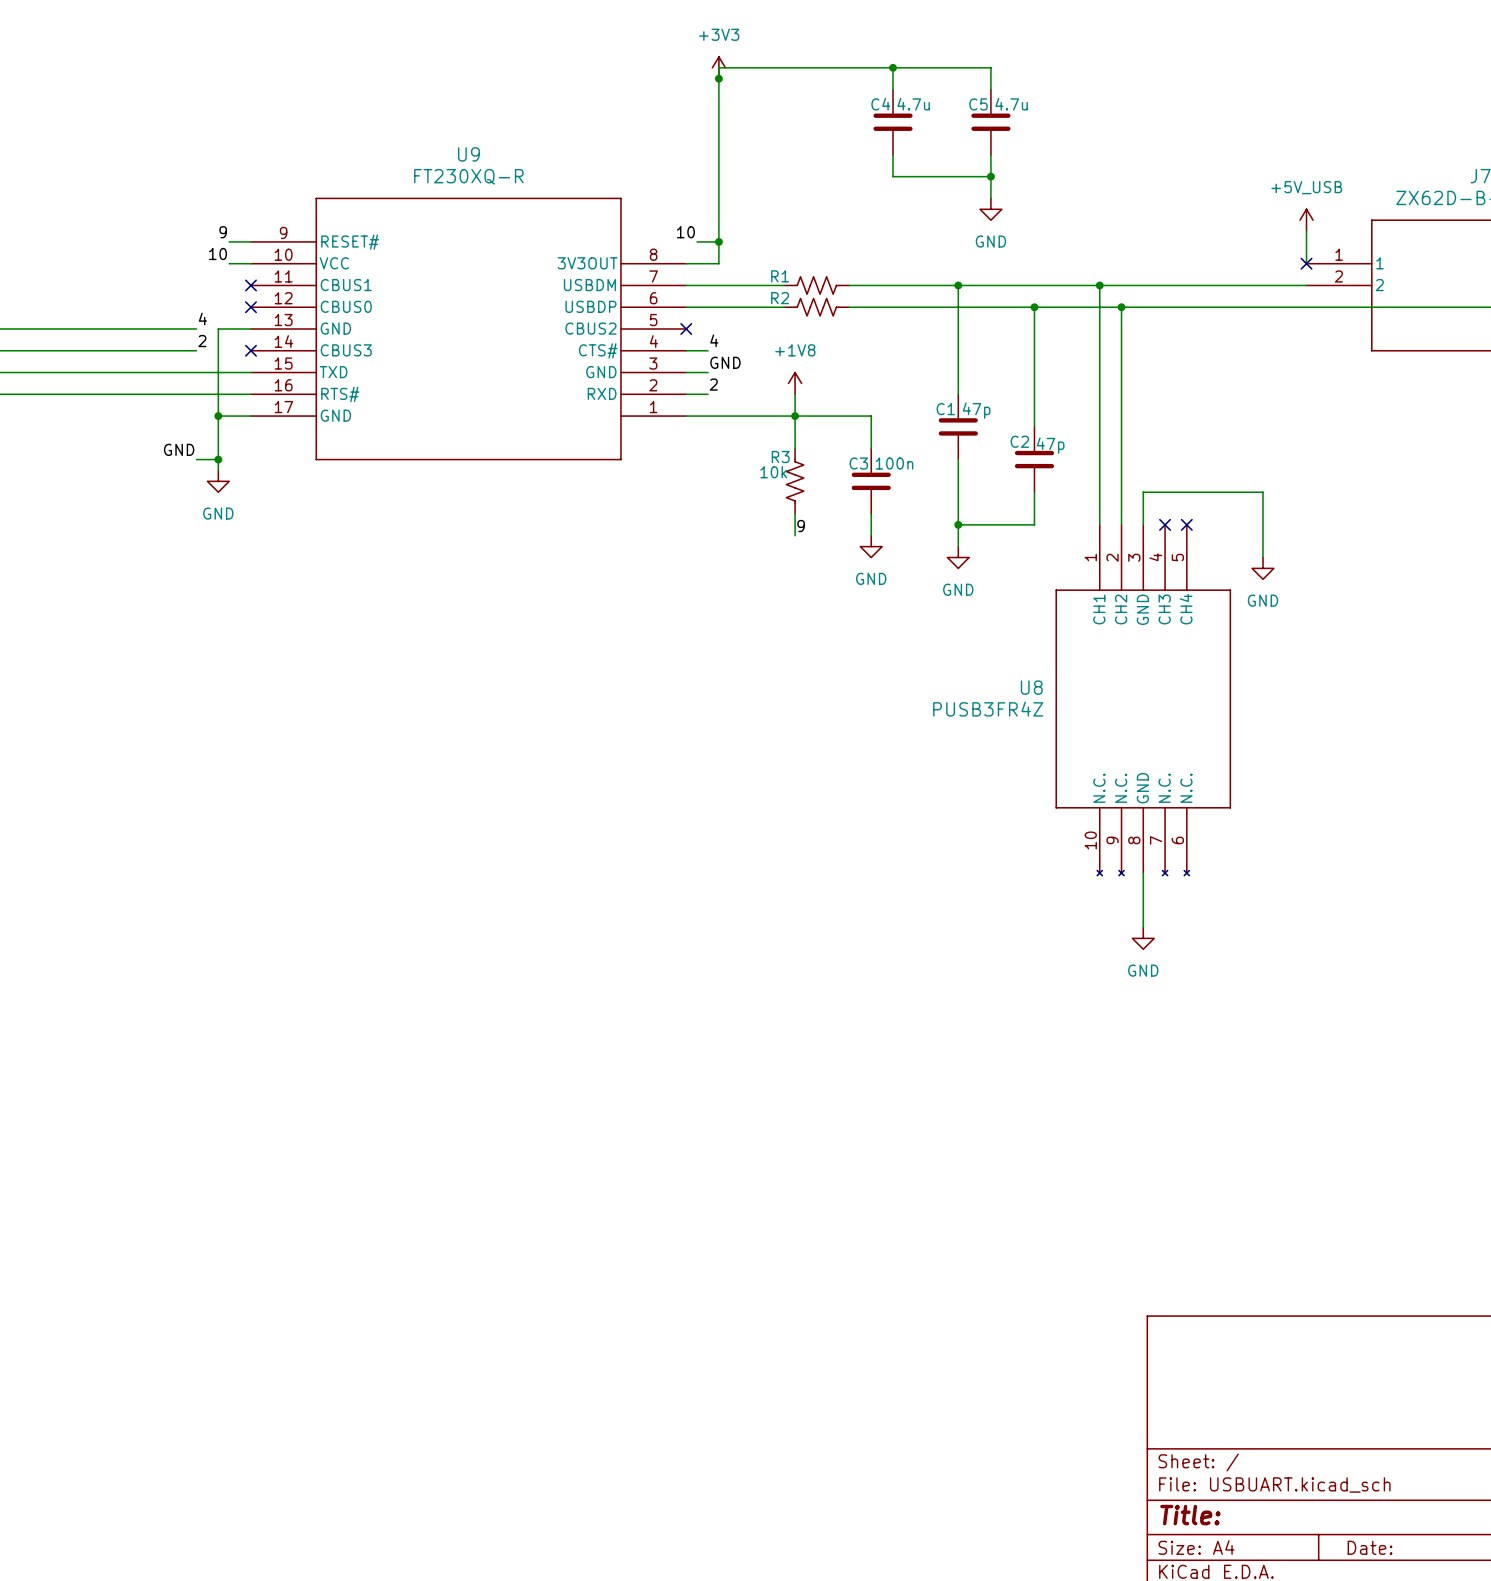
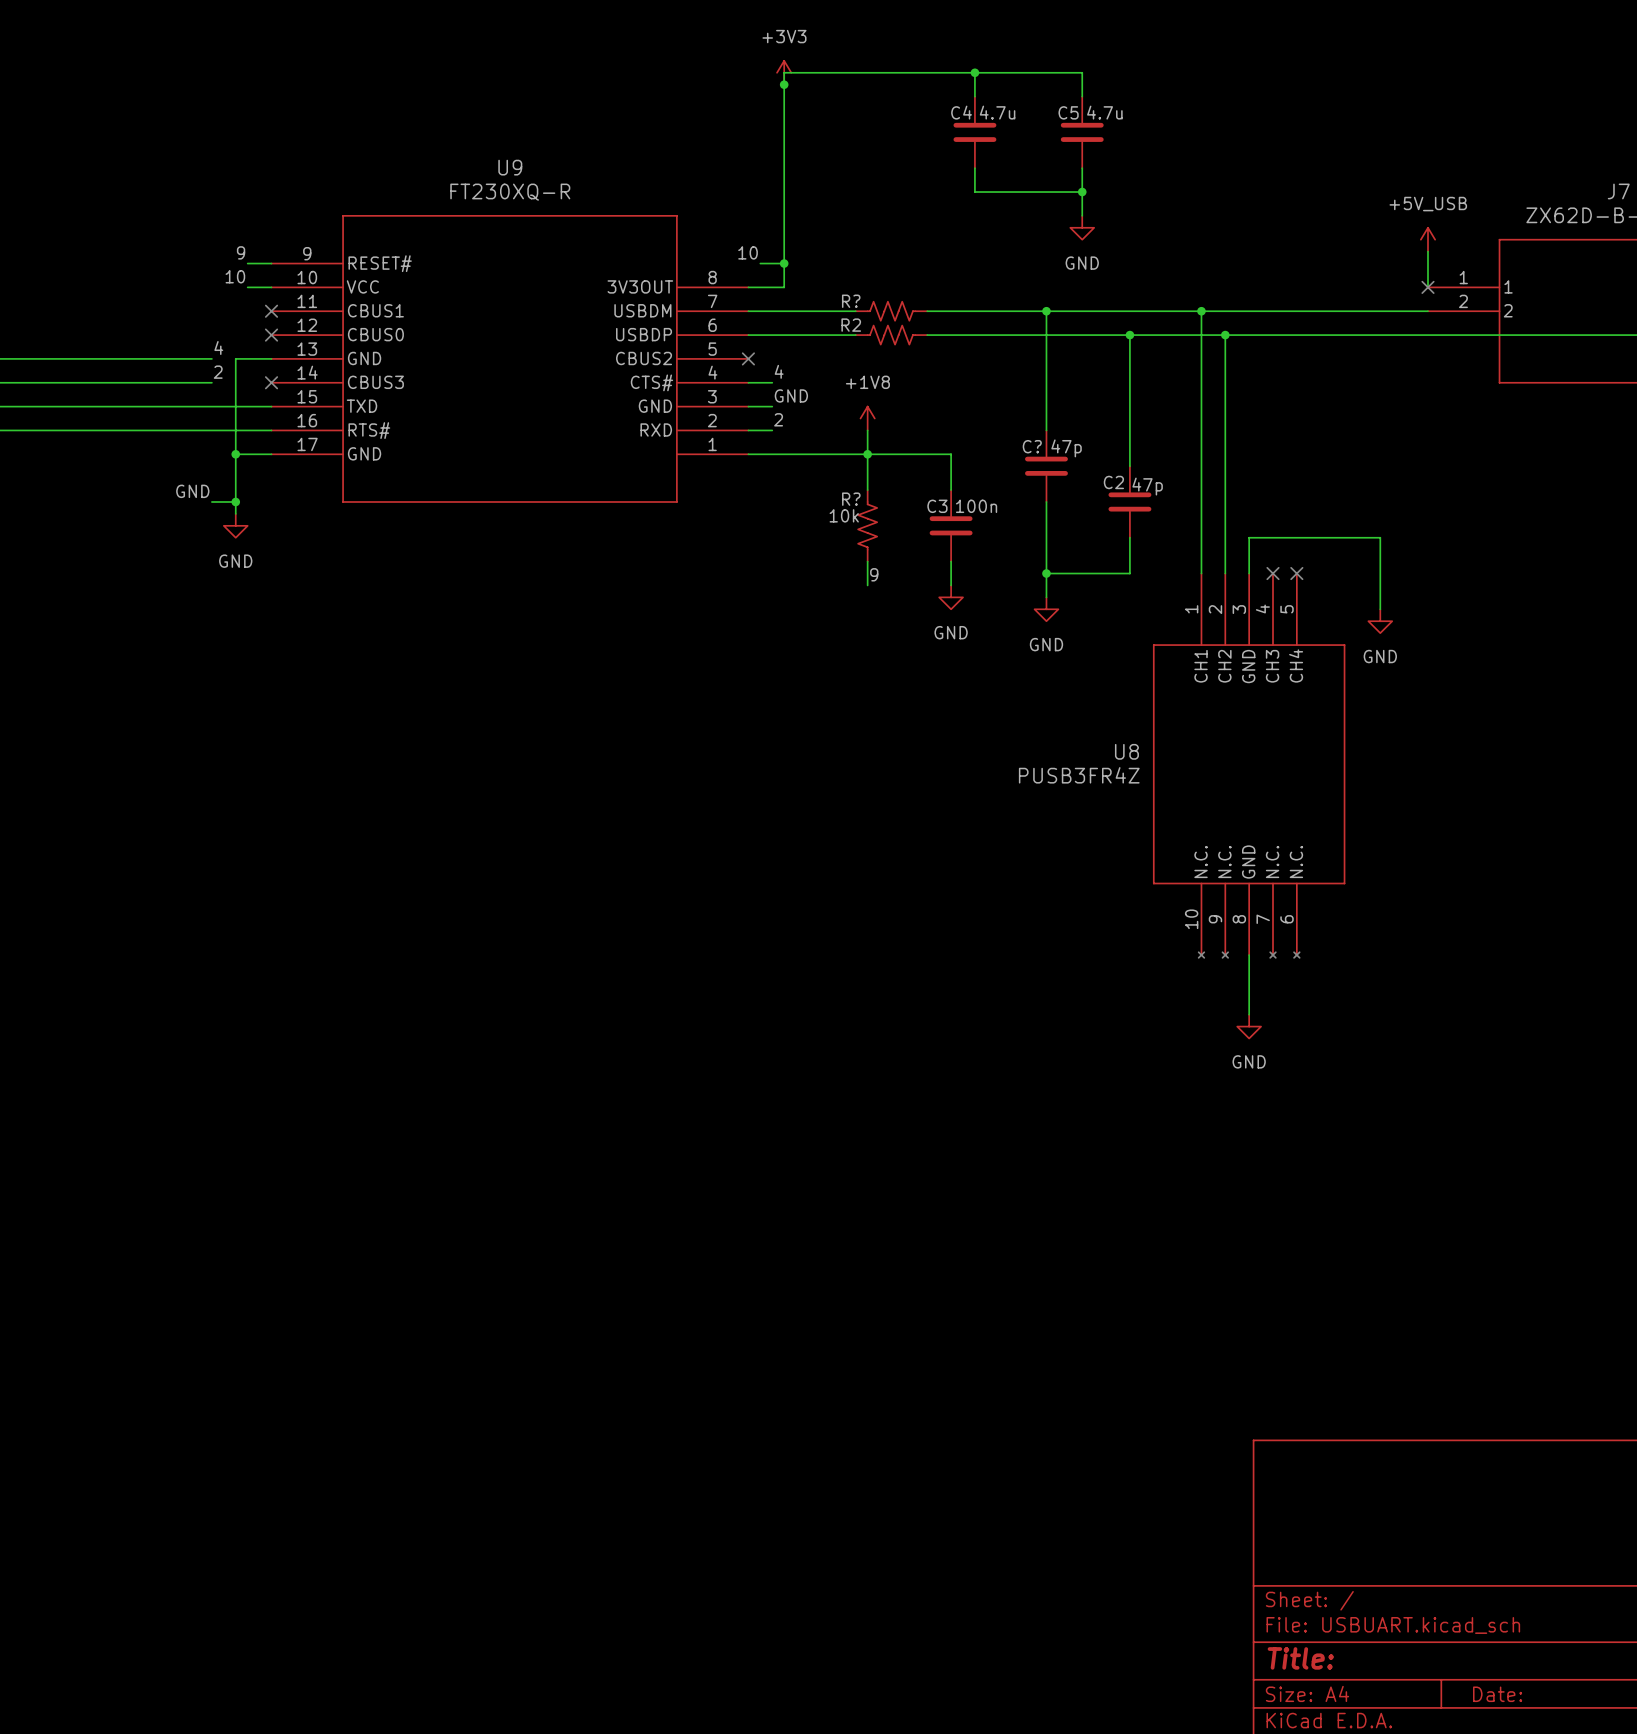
R1 name: R1 (780, 276) -> R? (851, 301)
C1 name: C1 (945, 409) -> C? (1032, 446)
R3 name: R3 (780, 456) -> R? (851, 499)

